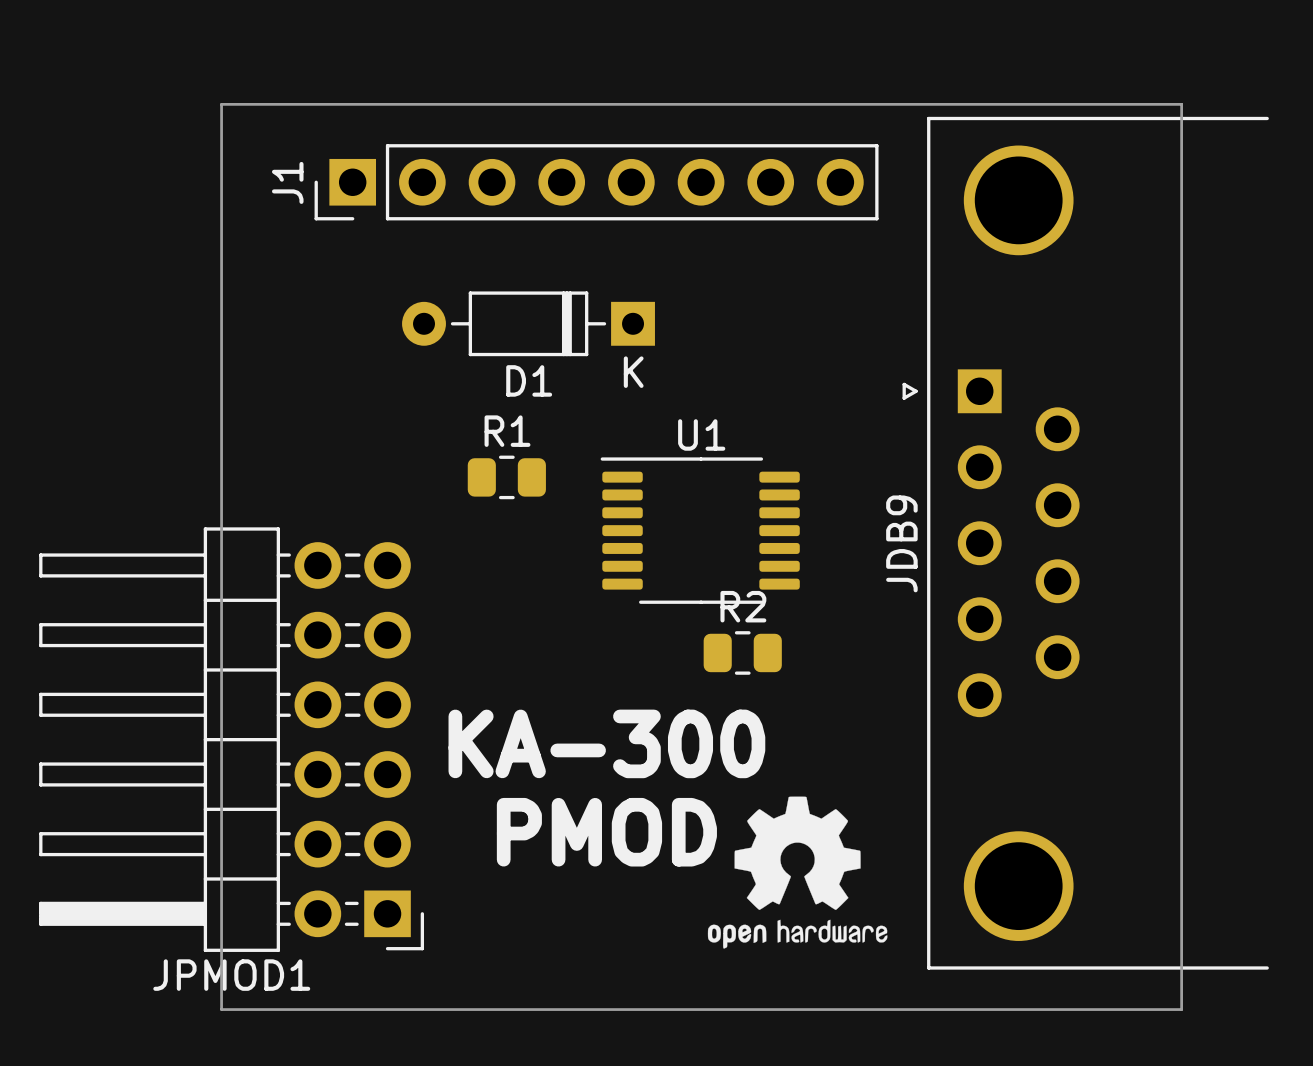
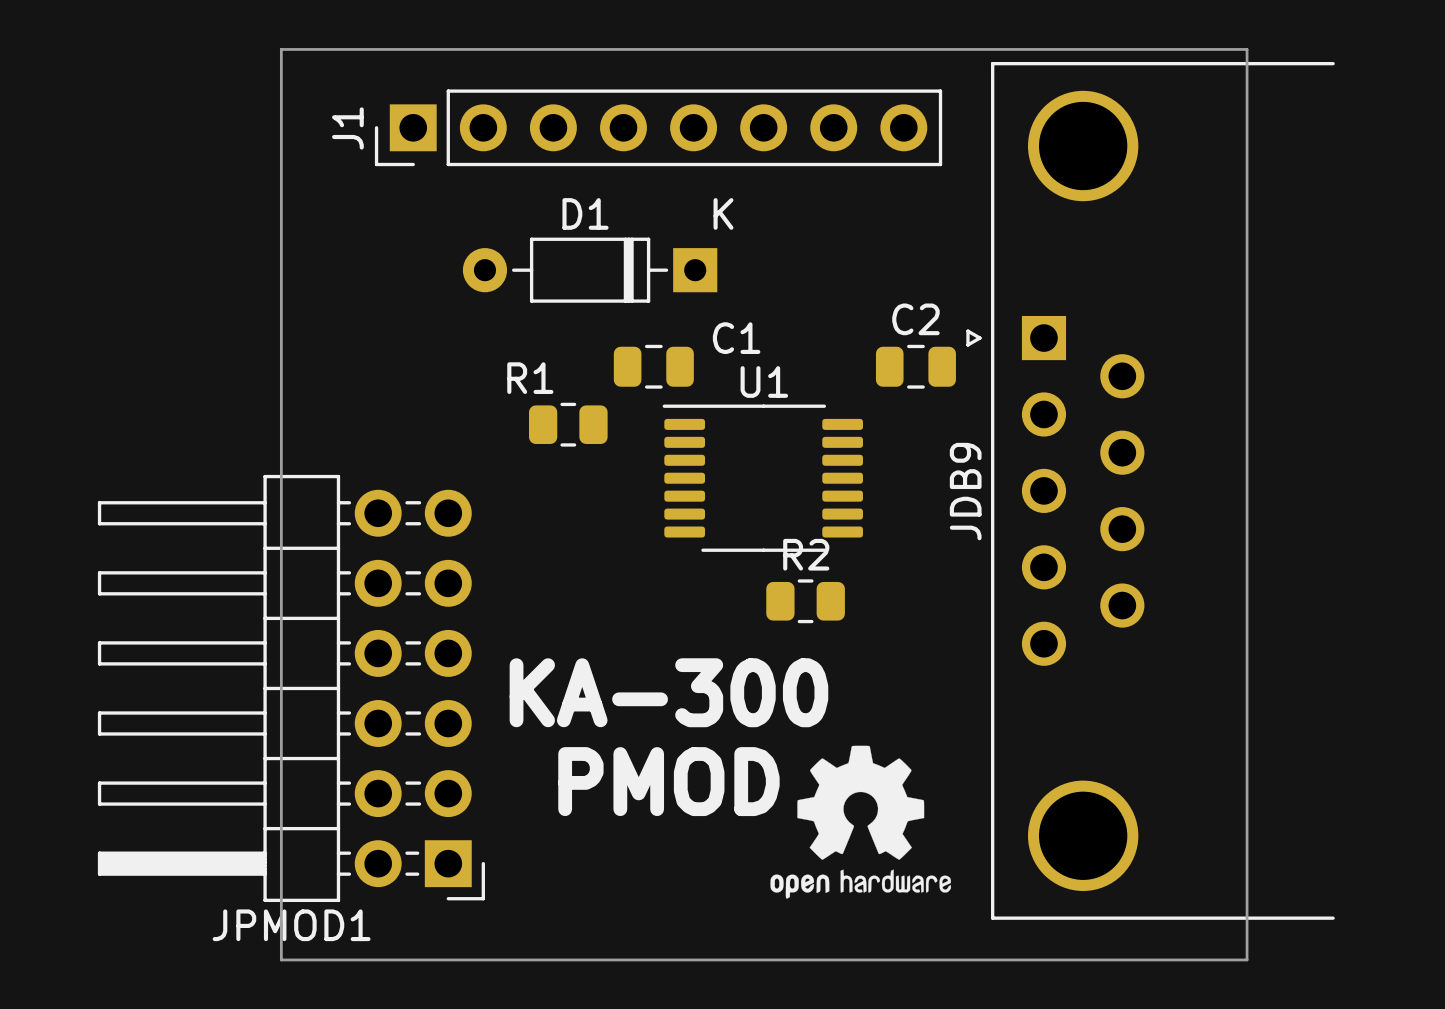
D1 text position: K (633, 372) -> K (723, 213)
D1 name position: D1 (529, 380) -> D1 (585, 213)
C1: none -> (653, 366)
C2: none -> (915, 366)
R1 name position: R1 (507, 431) -> R1 (530, 378)

